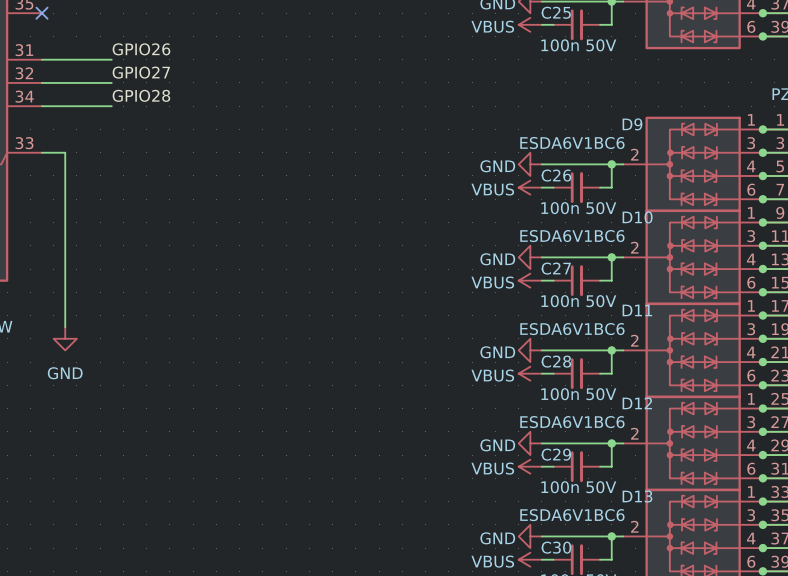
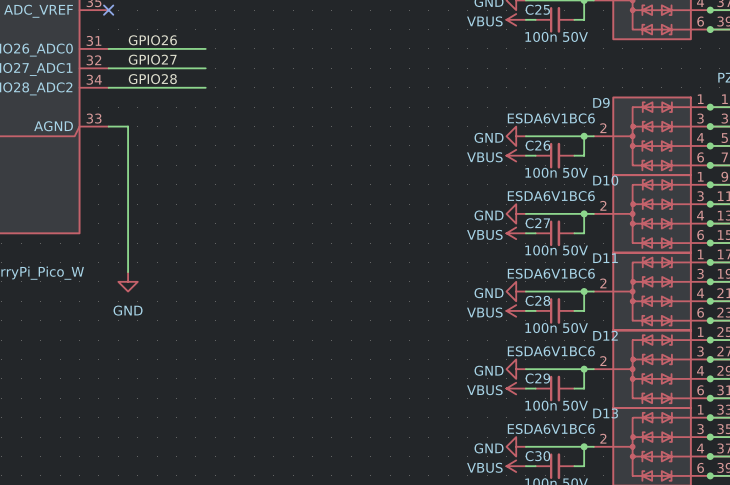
label position: GPIO26 (141, 49) -> GPIO26 (152, 40)
wire: none -> (166, 48) (205, 48)
label position: GPIO27 (141, 72) -> GPIO27 (152, 59)
wire: none -> (166, 68) (205, 68)
label position: GPIO28 (141, 95) -> GPIO28 (152, 79)
wire: none -> (166, 87) (205, 87)

